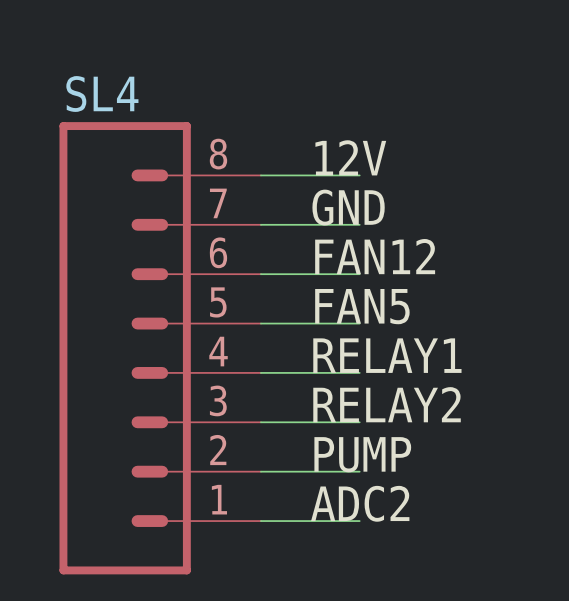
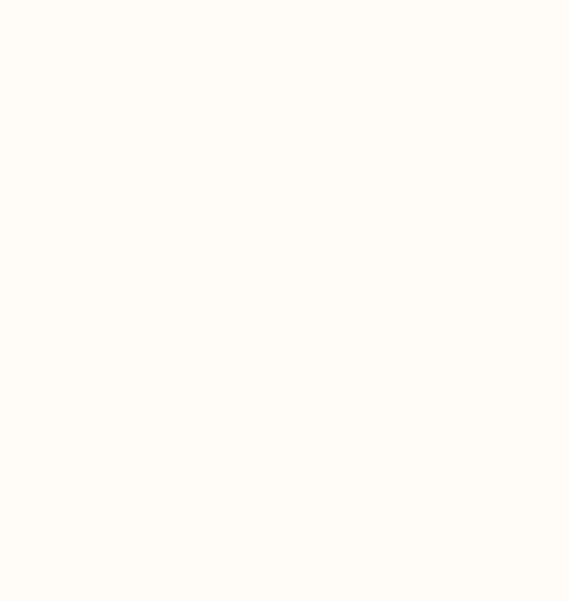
label: 12V (350, 157) -> none
wire: (260, 175) (359, 175) -> none
label: GND (348, 207) -> none
wire: (260, 224) (359, 224) -> none
label: FAN12 (375, 256) -> none
wire: (260, 274) (359, 274) -> none
label: FAN5 (362, 306) -> none
wire: (260, 323) (359, 323) -> none
SL4: (160, 348) -> none
label: RELAY1 (387, 355) -> none
wire: (260, 372) (359, 372) -> none
label: RELAY2 (387, 404) -> none
wire: (260, 422) (359, 422) -> none
label: PUMP (362, 454) -> none
wire: (260, 471) (359, 471) -> none
label: ADC2 (360, 503) -> none
wire: (260, 521) (359, 521) -> none

